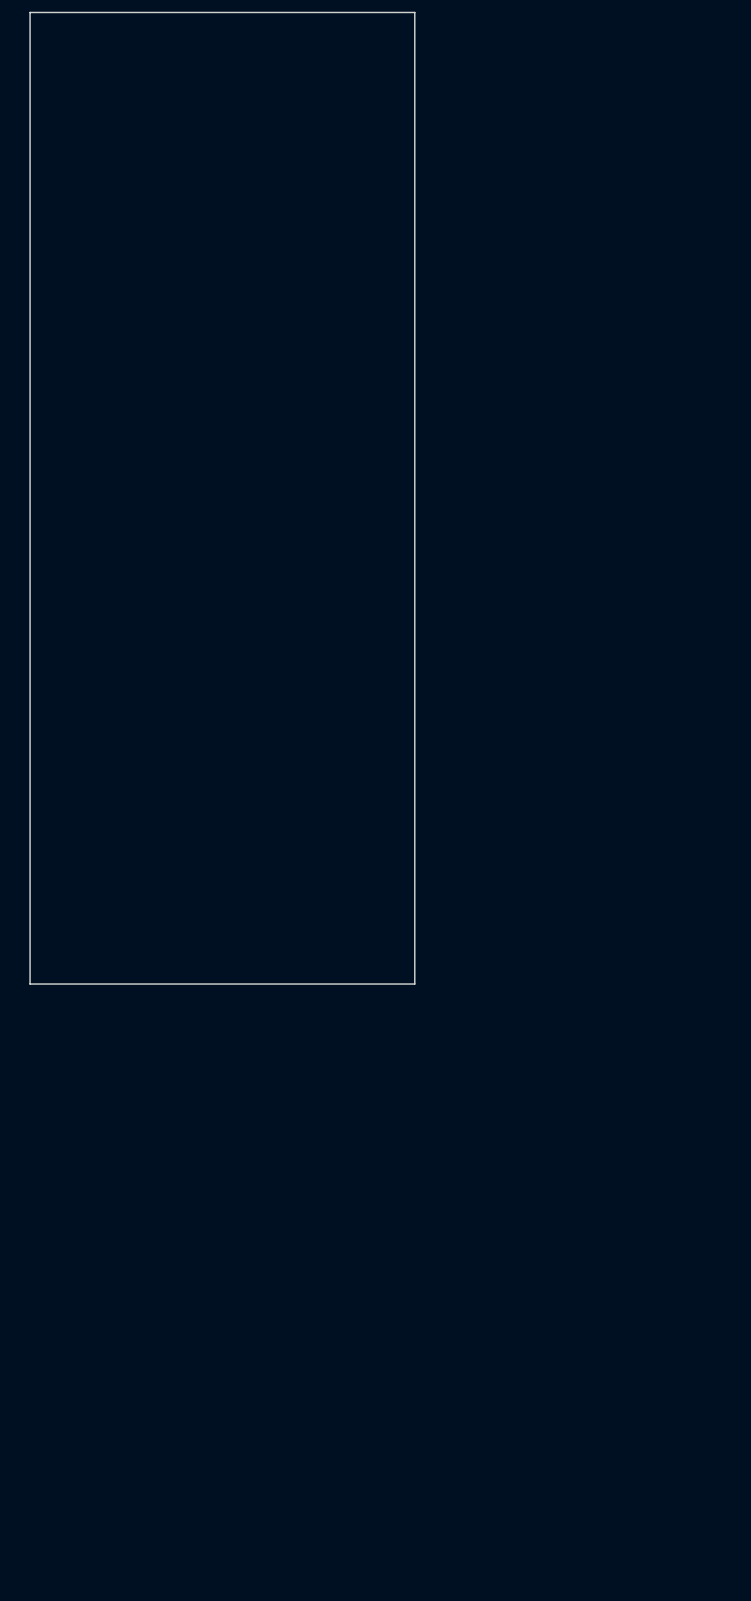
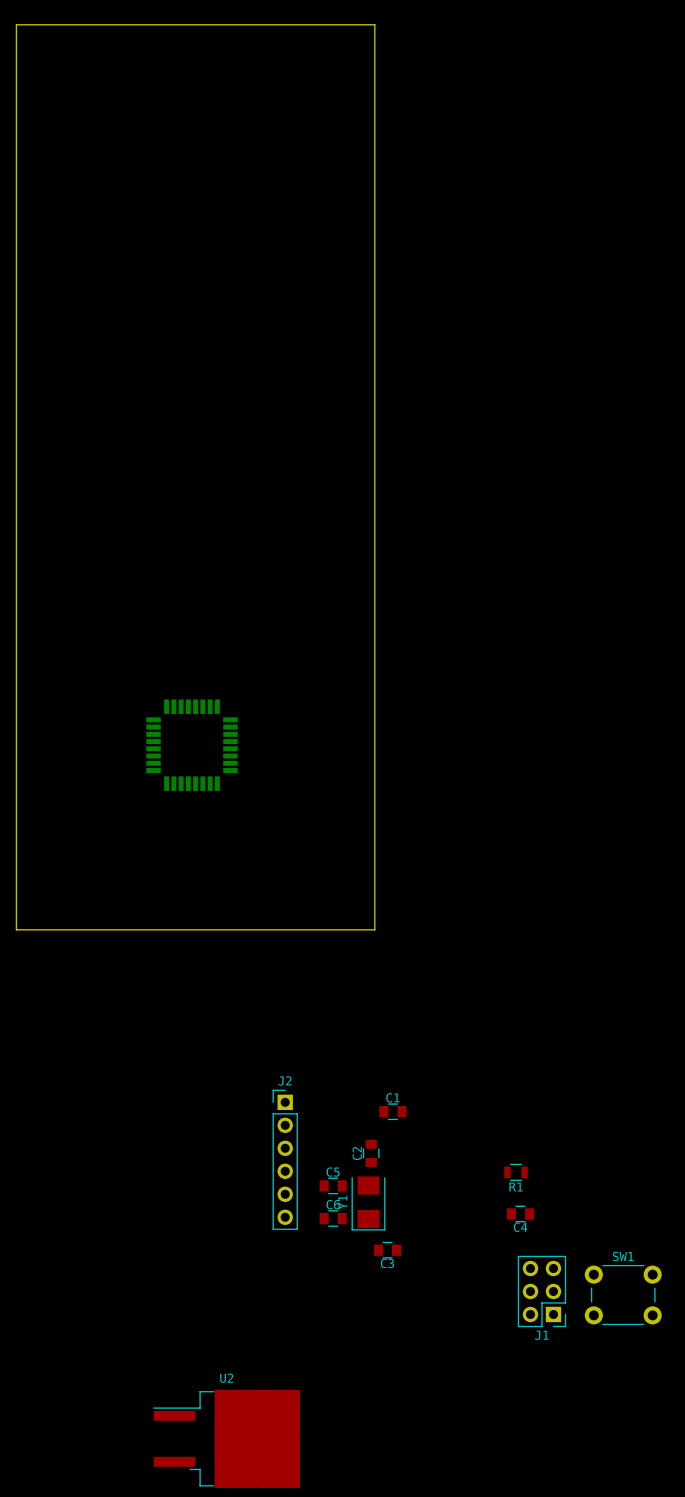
part: none -> (191, 745)
C1: none -> (392, 1111)
C2: none -> (371, 1153)
J2: none -> (285, 1159)
R1: none -> (516, 1172)
C5: none -> (333, 1185)
Y1: none -> (368, 1203)
C4: none -> (520, 1214)
C6: none -> (333, 1218)
C3: none -> (387, 1250)
J1: none -> (541, 1291)
SW1: none -> (623, 1295)
U2: none -> (226, 1438)

